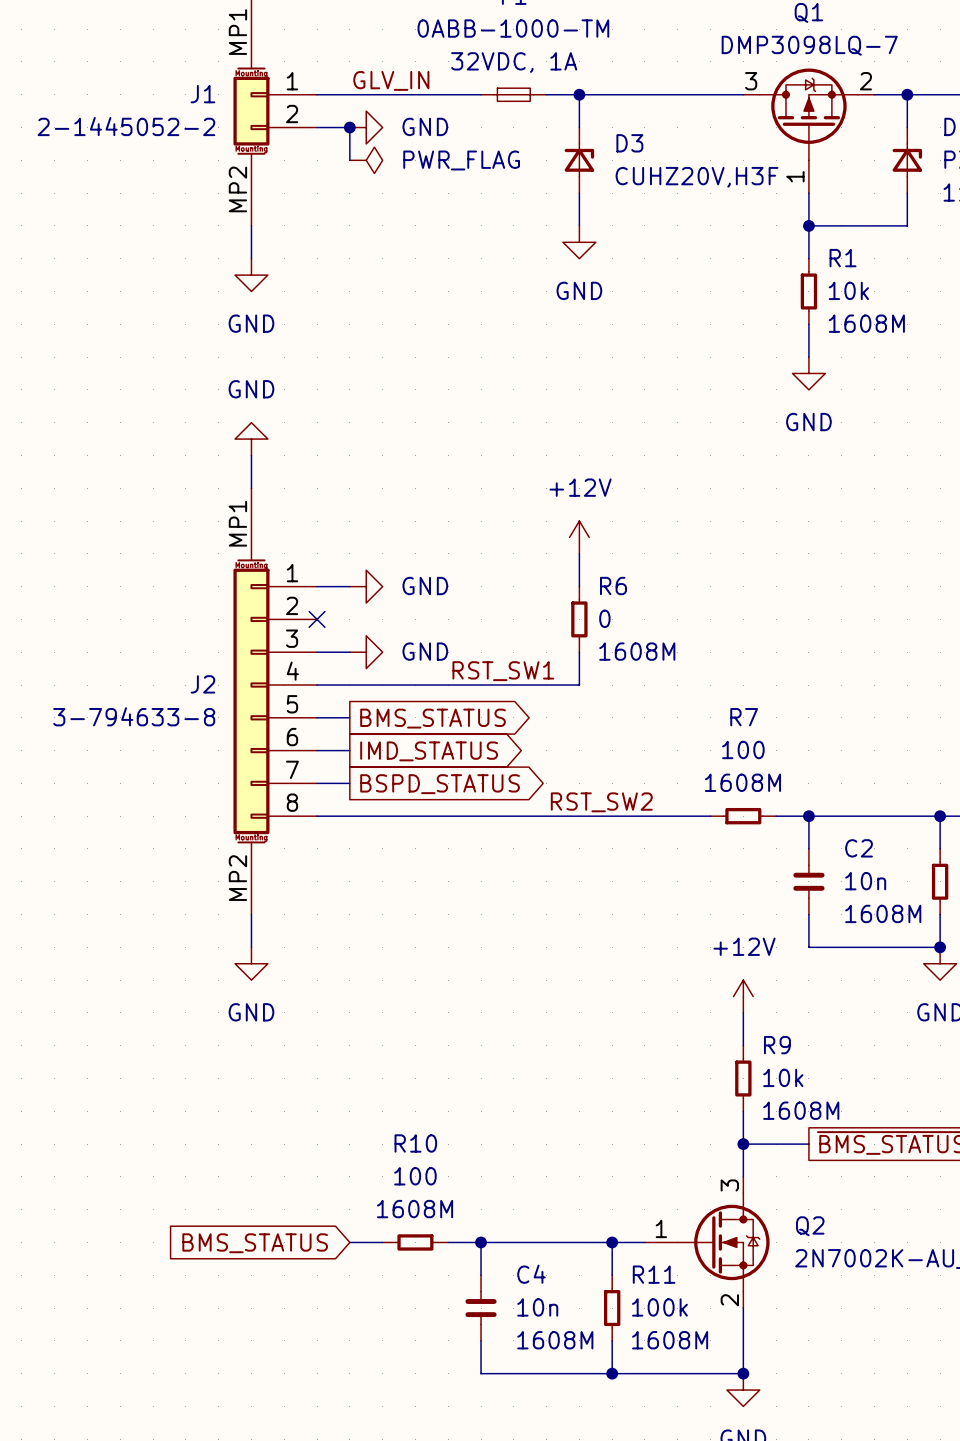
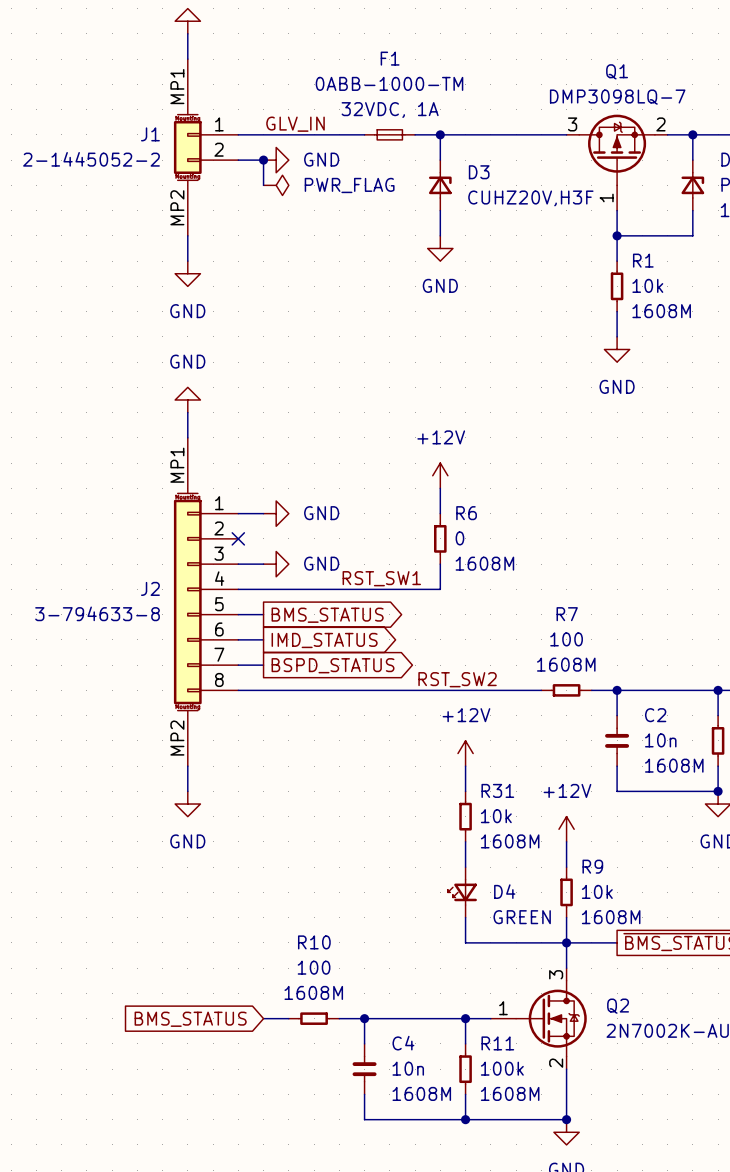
power symbol: none -> +12V (465, 753)
wire: none -> (465, 766) (465, 791)
R31: none -> 10k (465, 816)
wire: none -> (465, 841) (465, 867)
D4: none -> (462, 892)
wire: none -> (465, 917) (465, 942) (566, 942)

